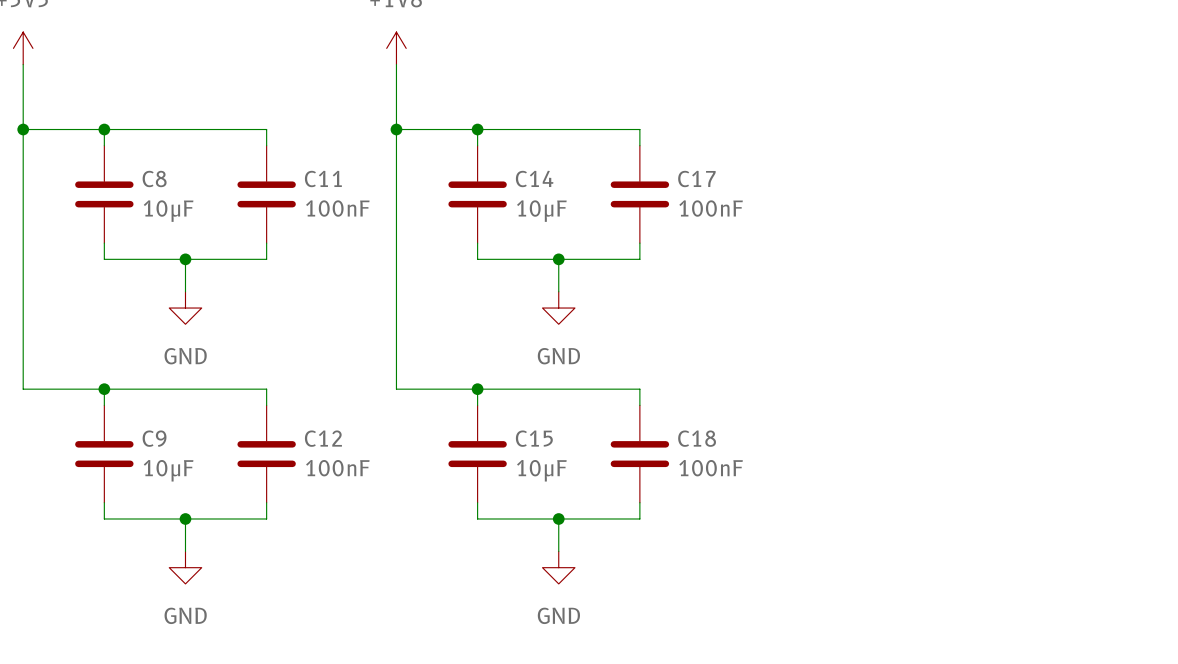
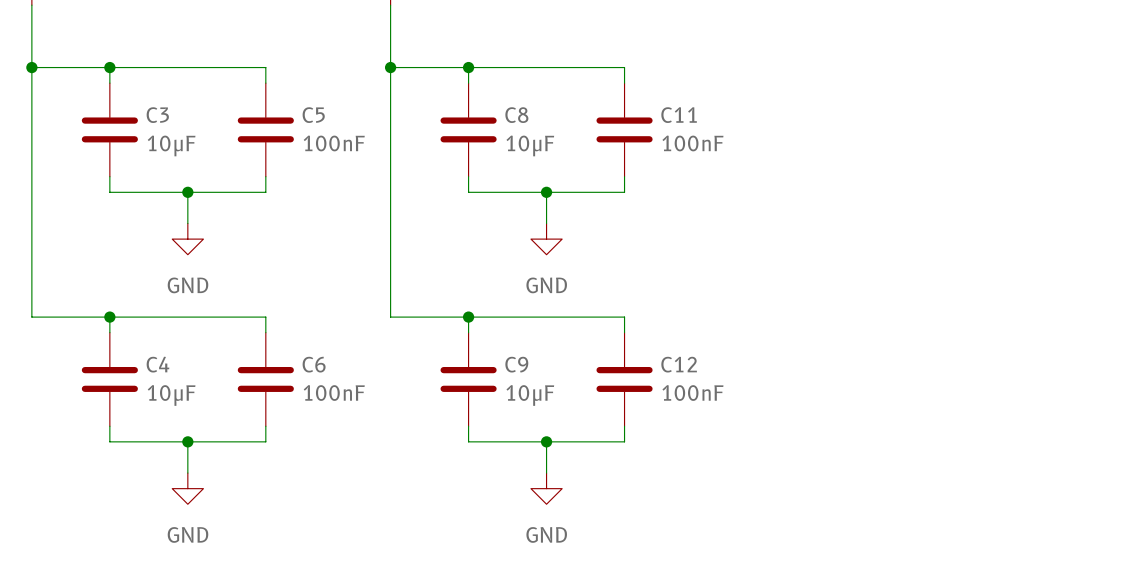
C8 name: C8 (154, 178) -> C3 (157, 115)
C11 name: C11 (323, 178) -> C5 (313, 115)
C14 name: C14 (534, 178) -> C8 (516, 115)
C17 name: C17 (696, 178) -> C11 (679, 115)
C9 name: C9 (154, 438) -> C4 (157, 364)
C12 name: C12 (323, 438) -> C6 (314, 364)
C15 name: C15 (534, 438) -> C9 (516, 364)
C18 name: C18 (697, 438) -> C12 (679, 364)

